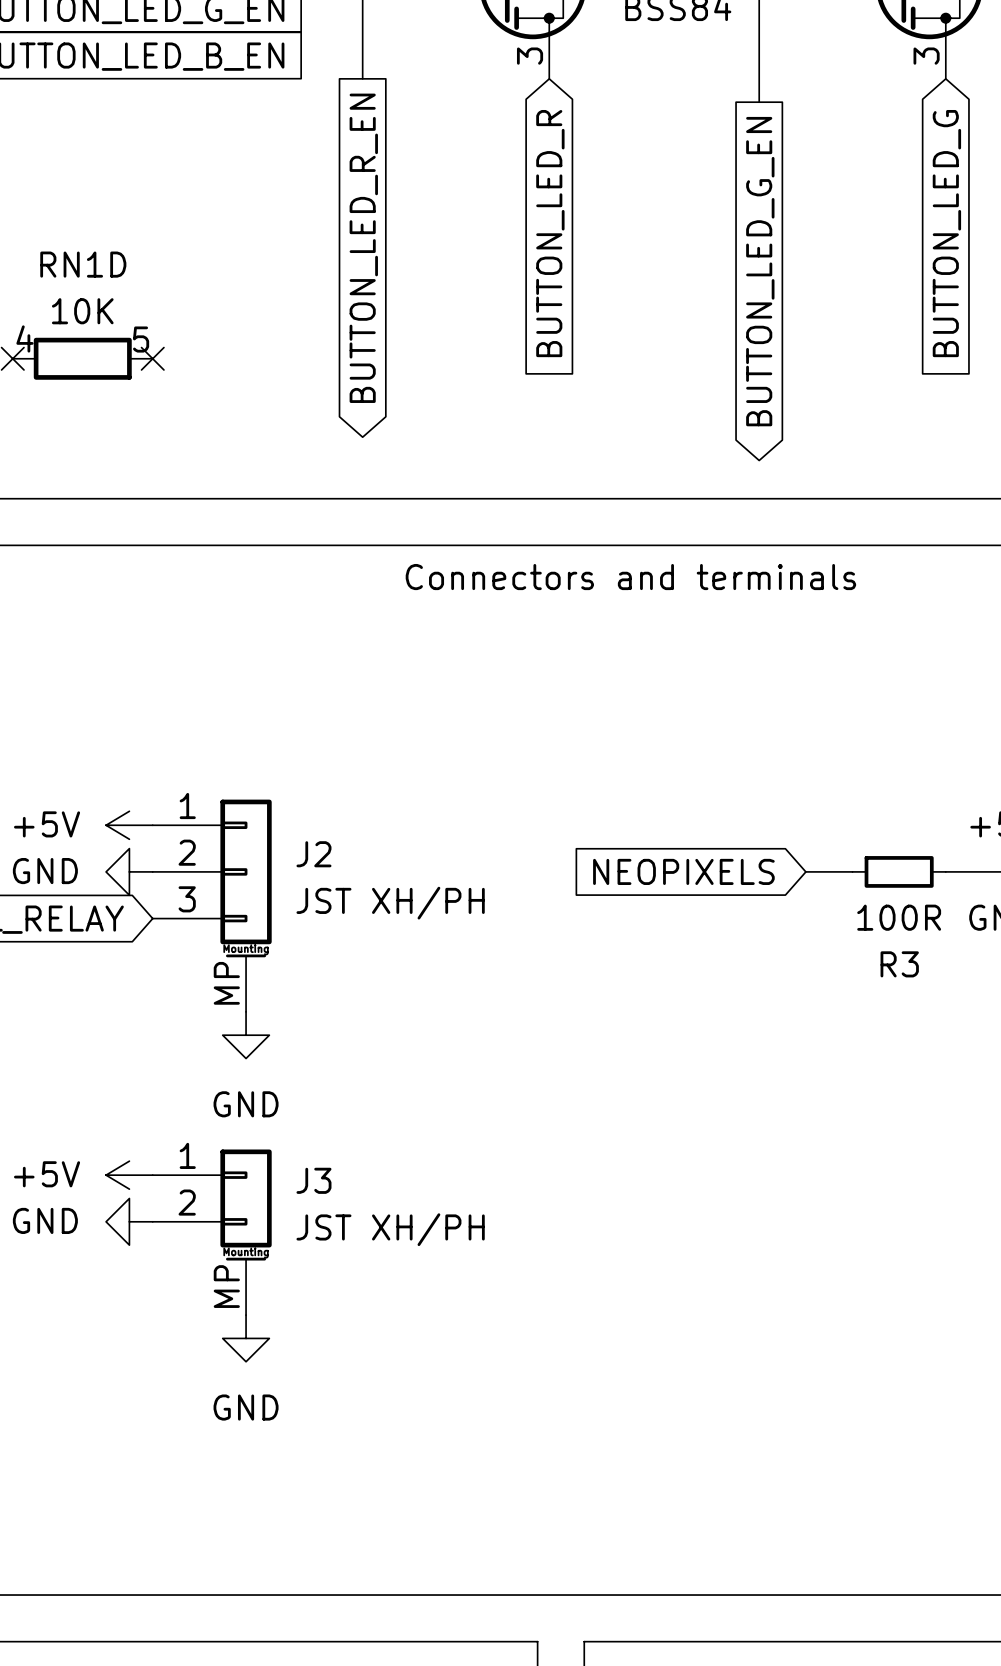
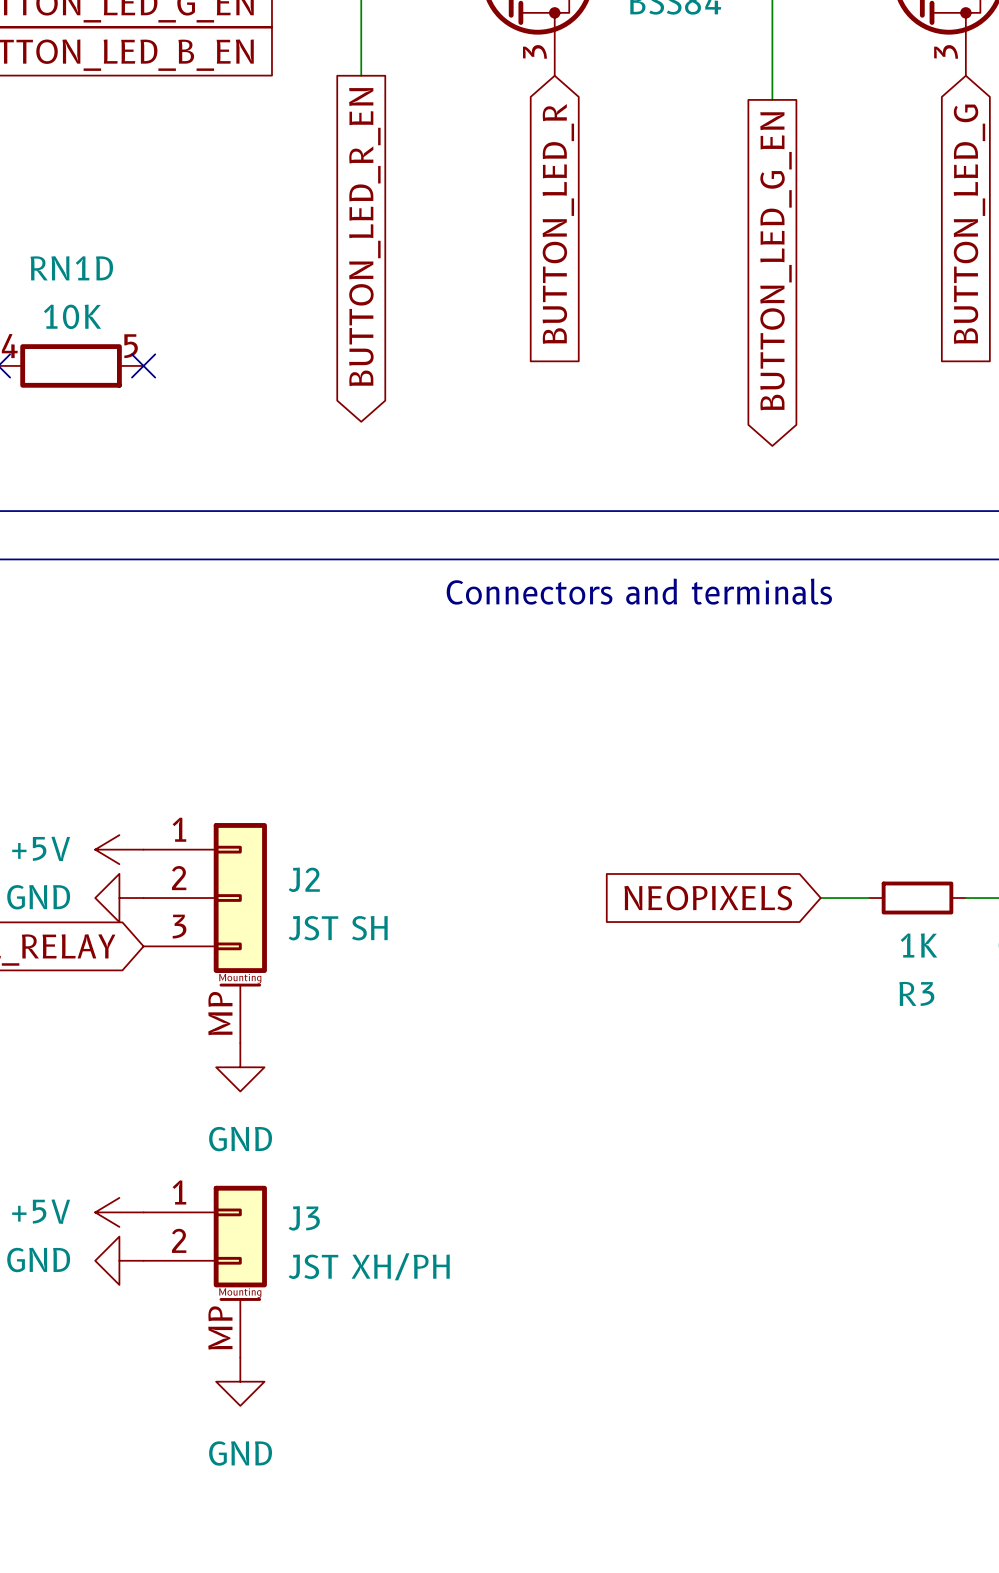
J2 value: JST XH/PH (390, 903) -> JST SH (338, 928)
R3 value: 100R (899, 917) -> 1K (918, 945)

